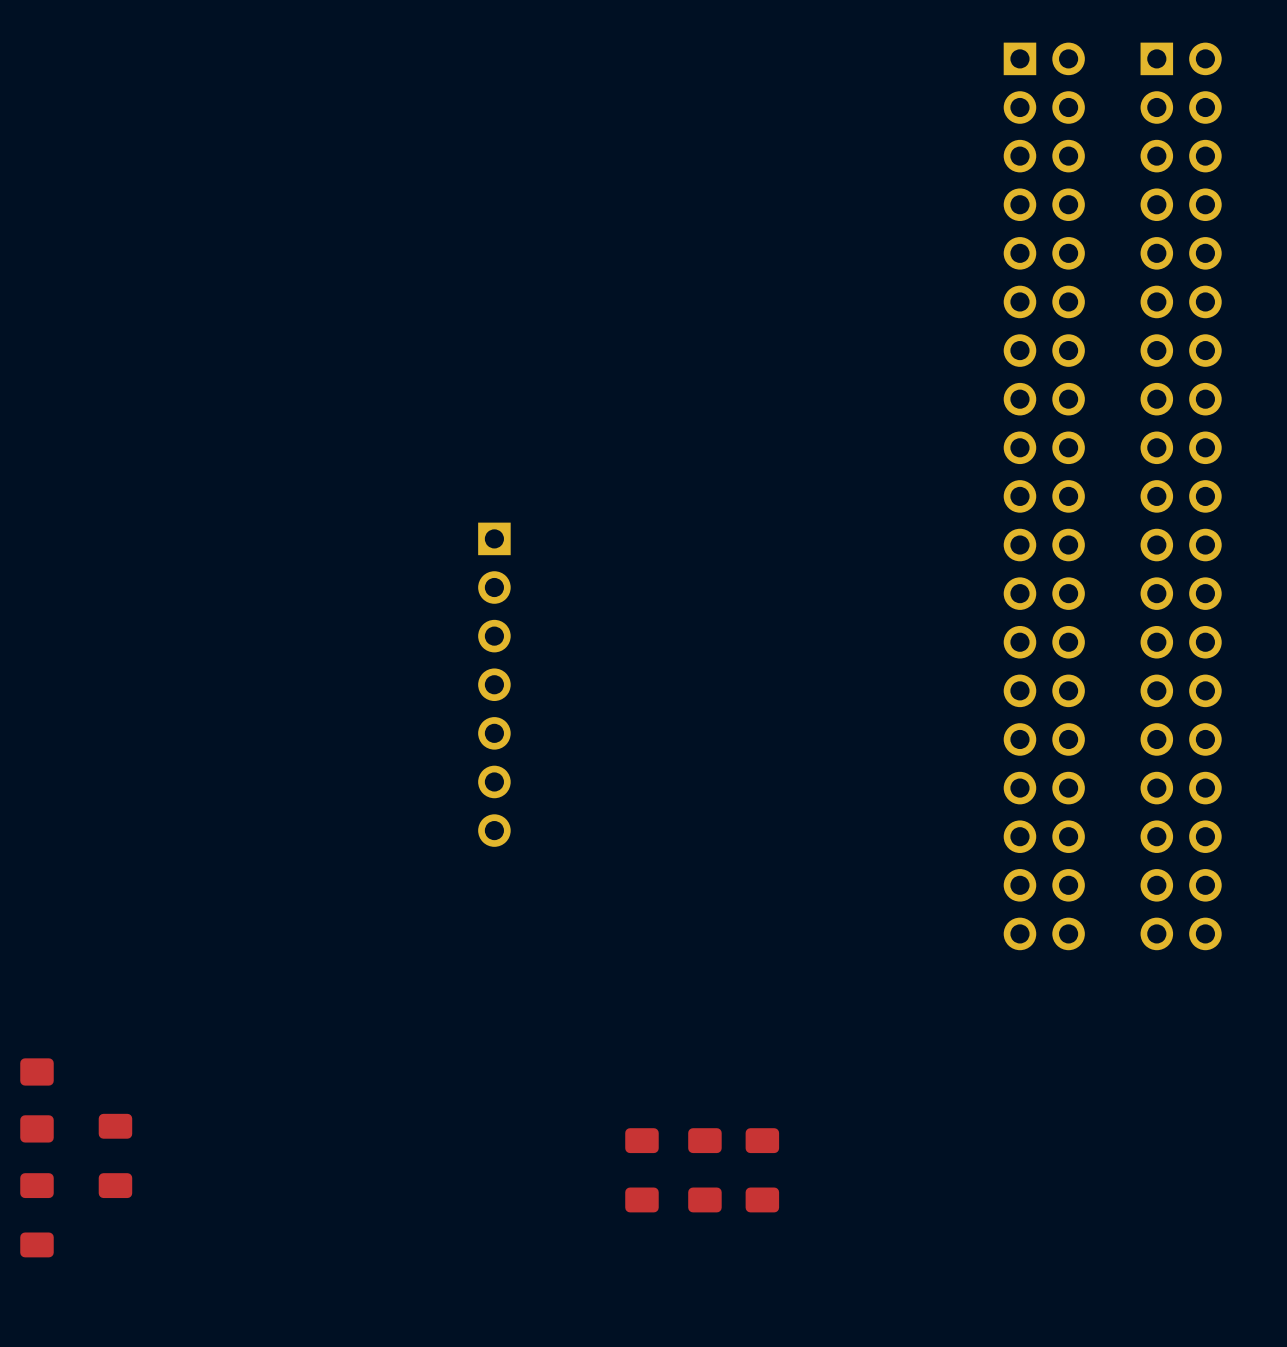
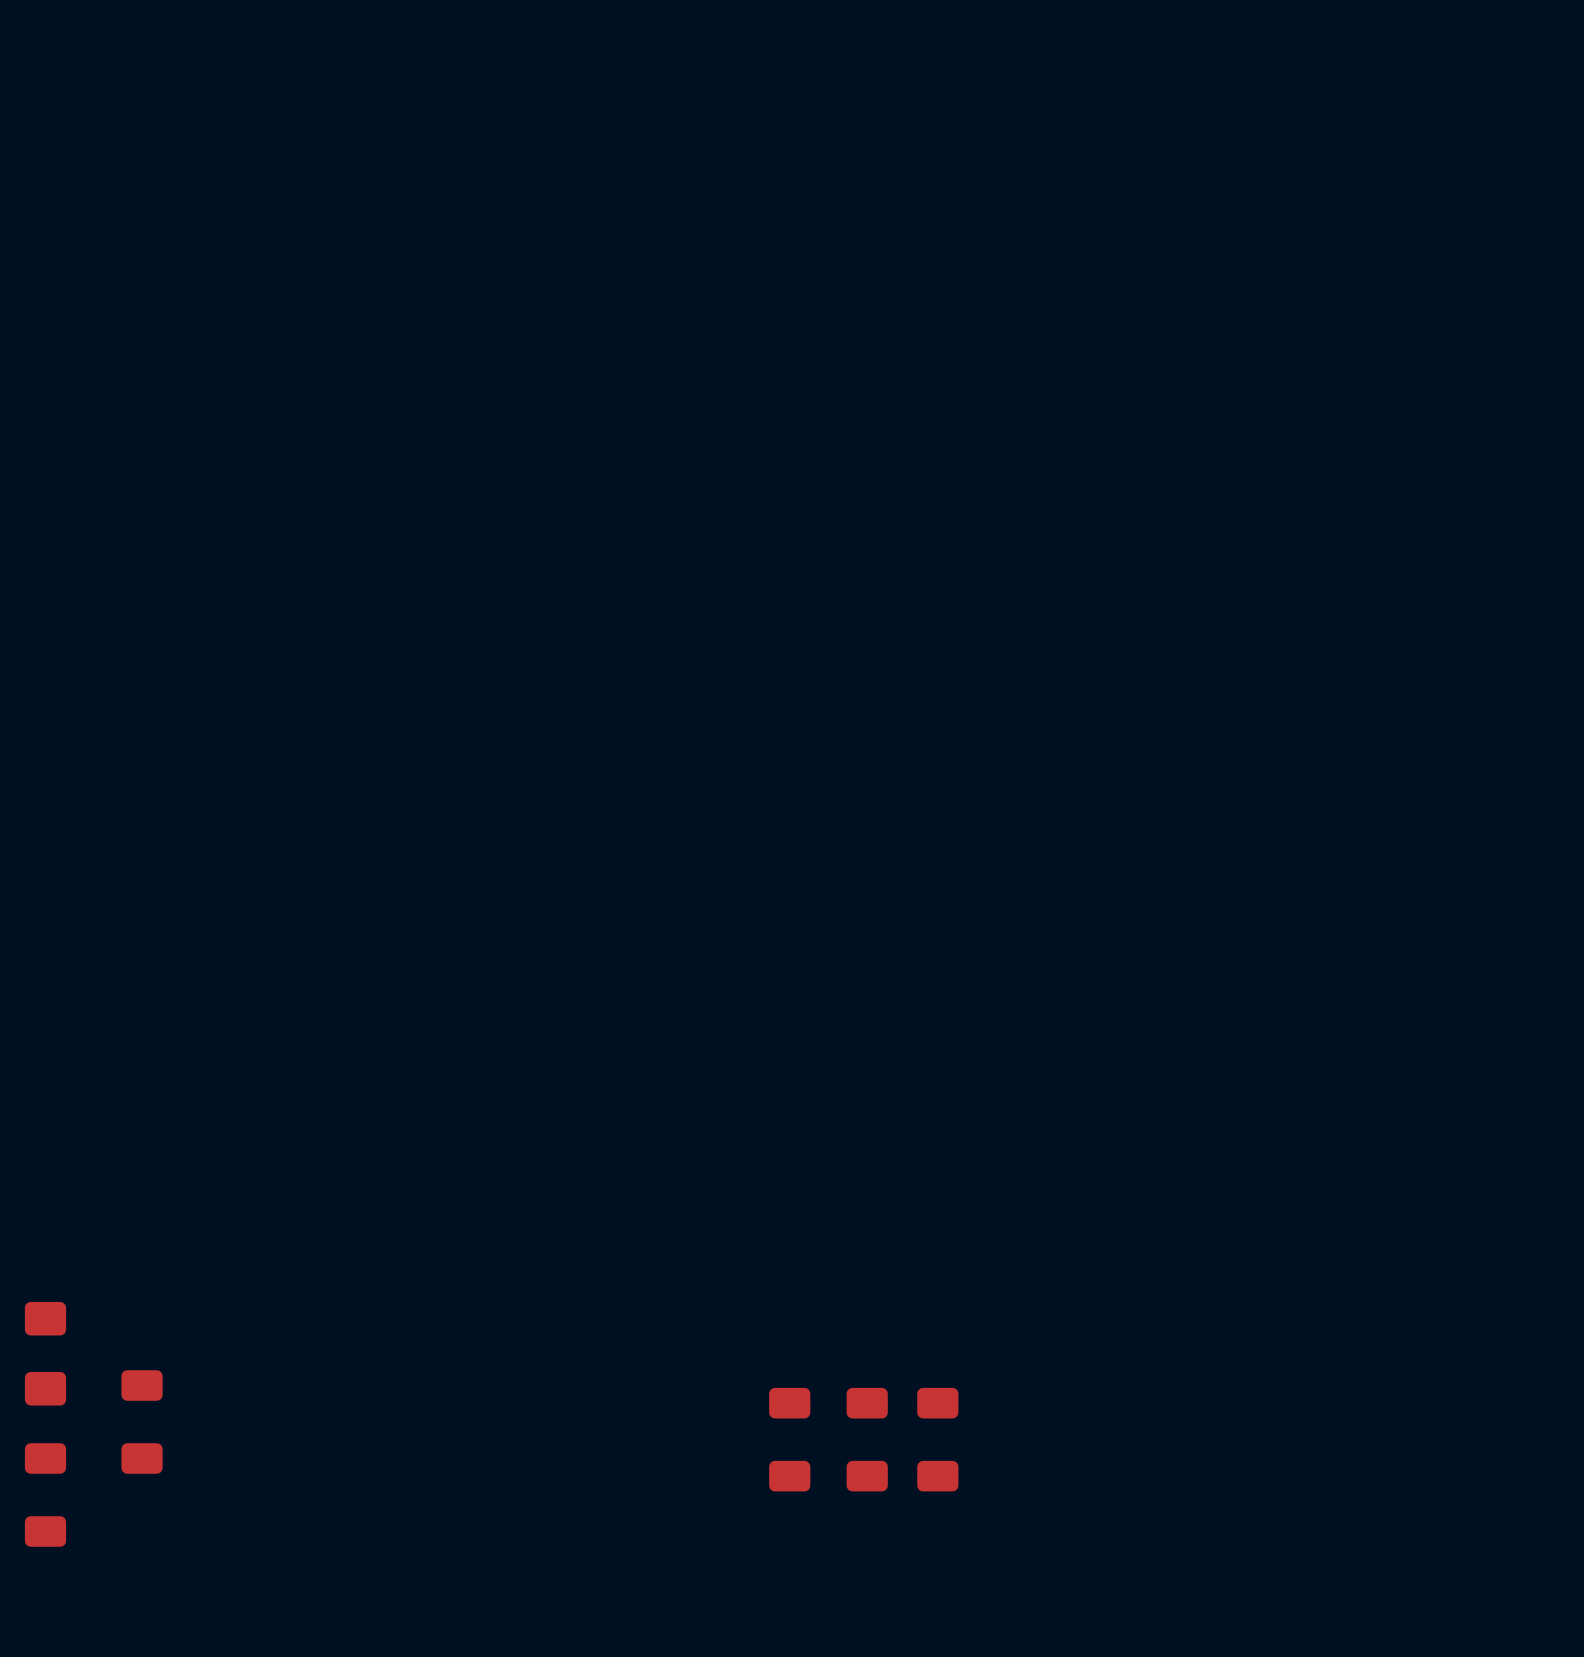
part: (1044, 496) -> none
part: (1181, 496) -> none
part: (494, 684) -> none

